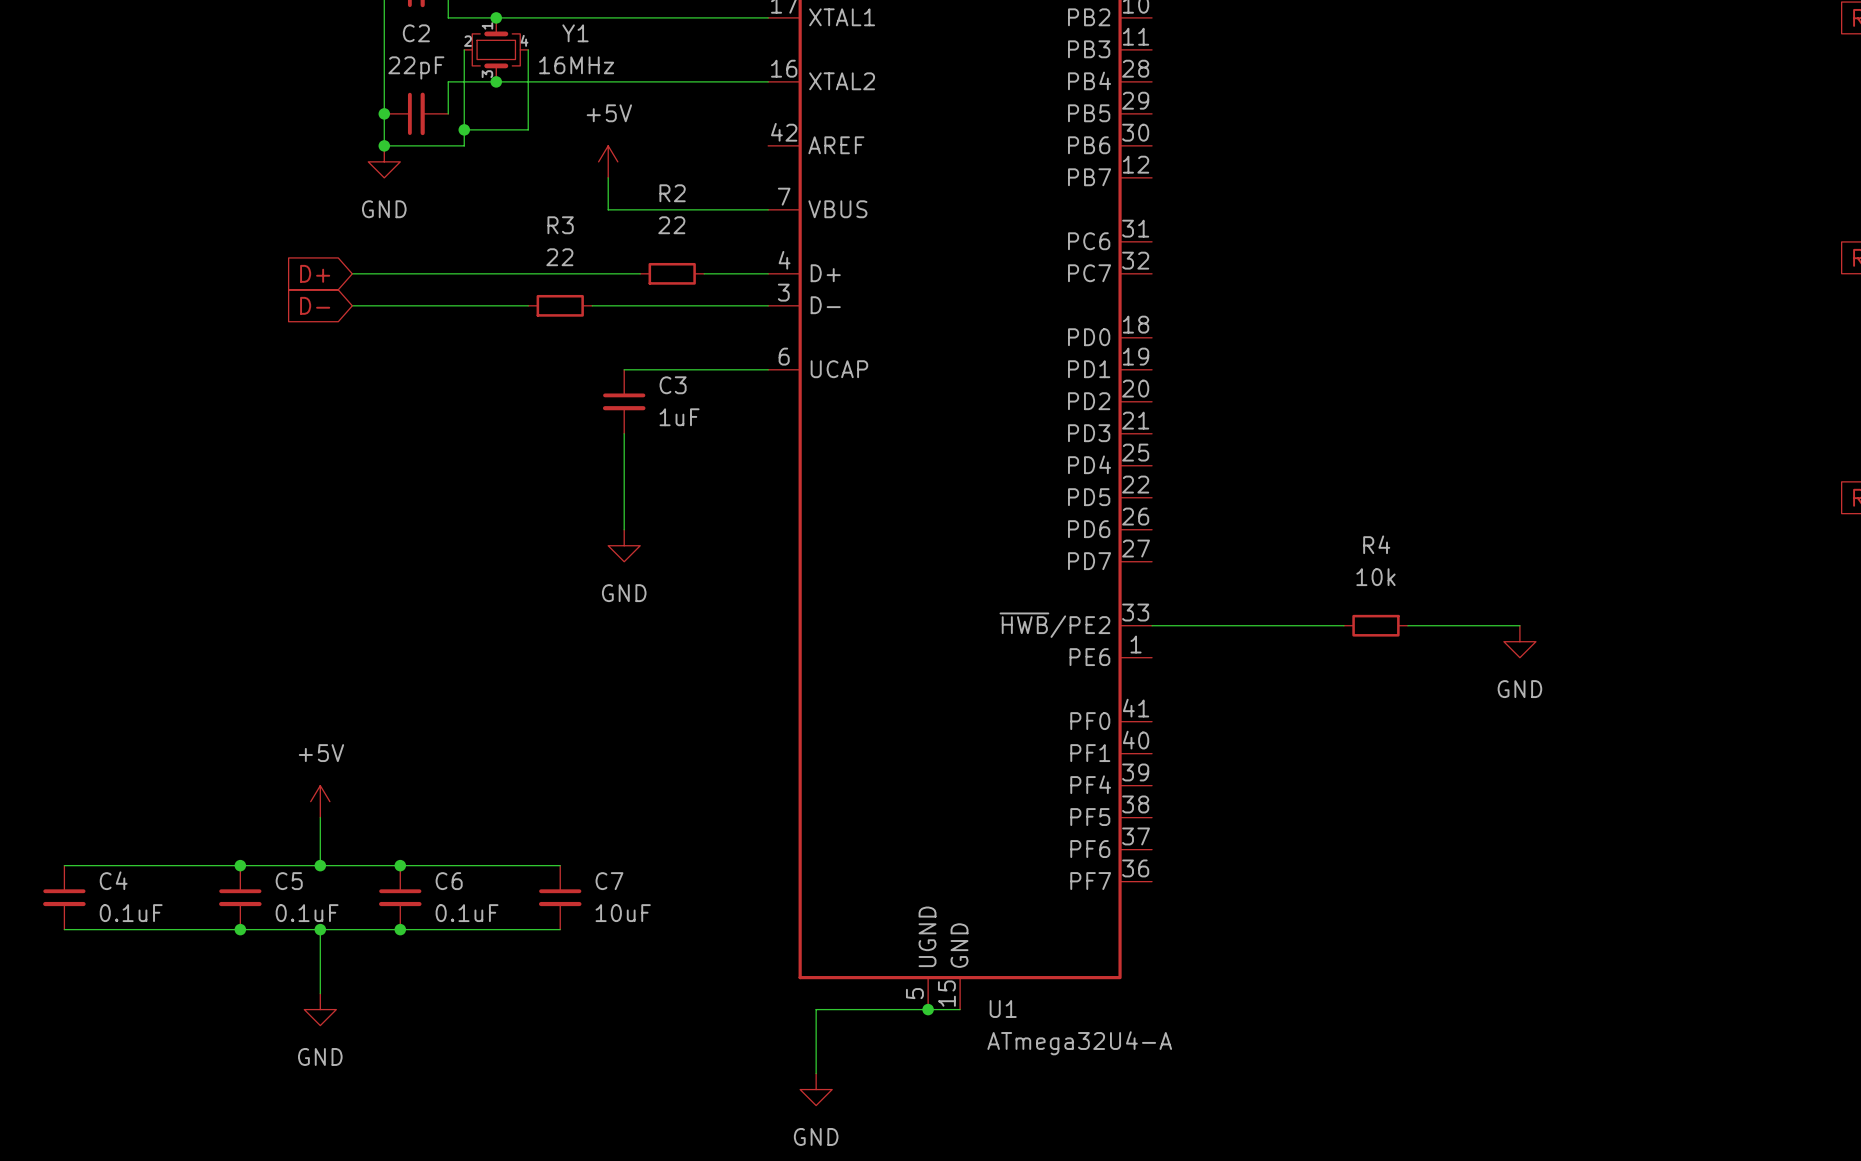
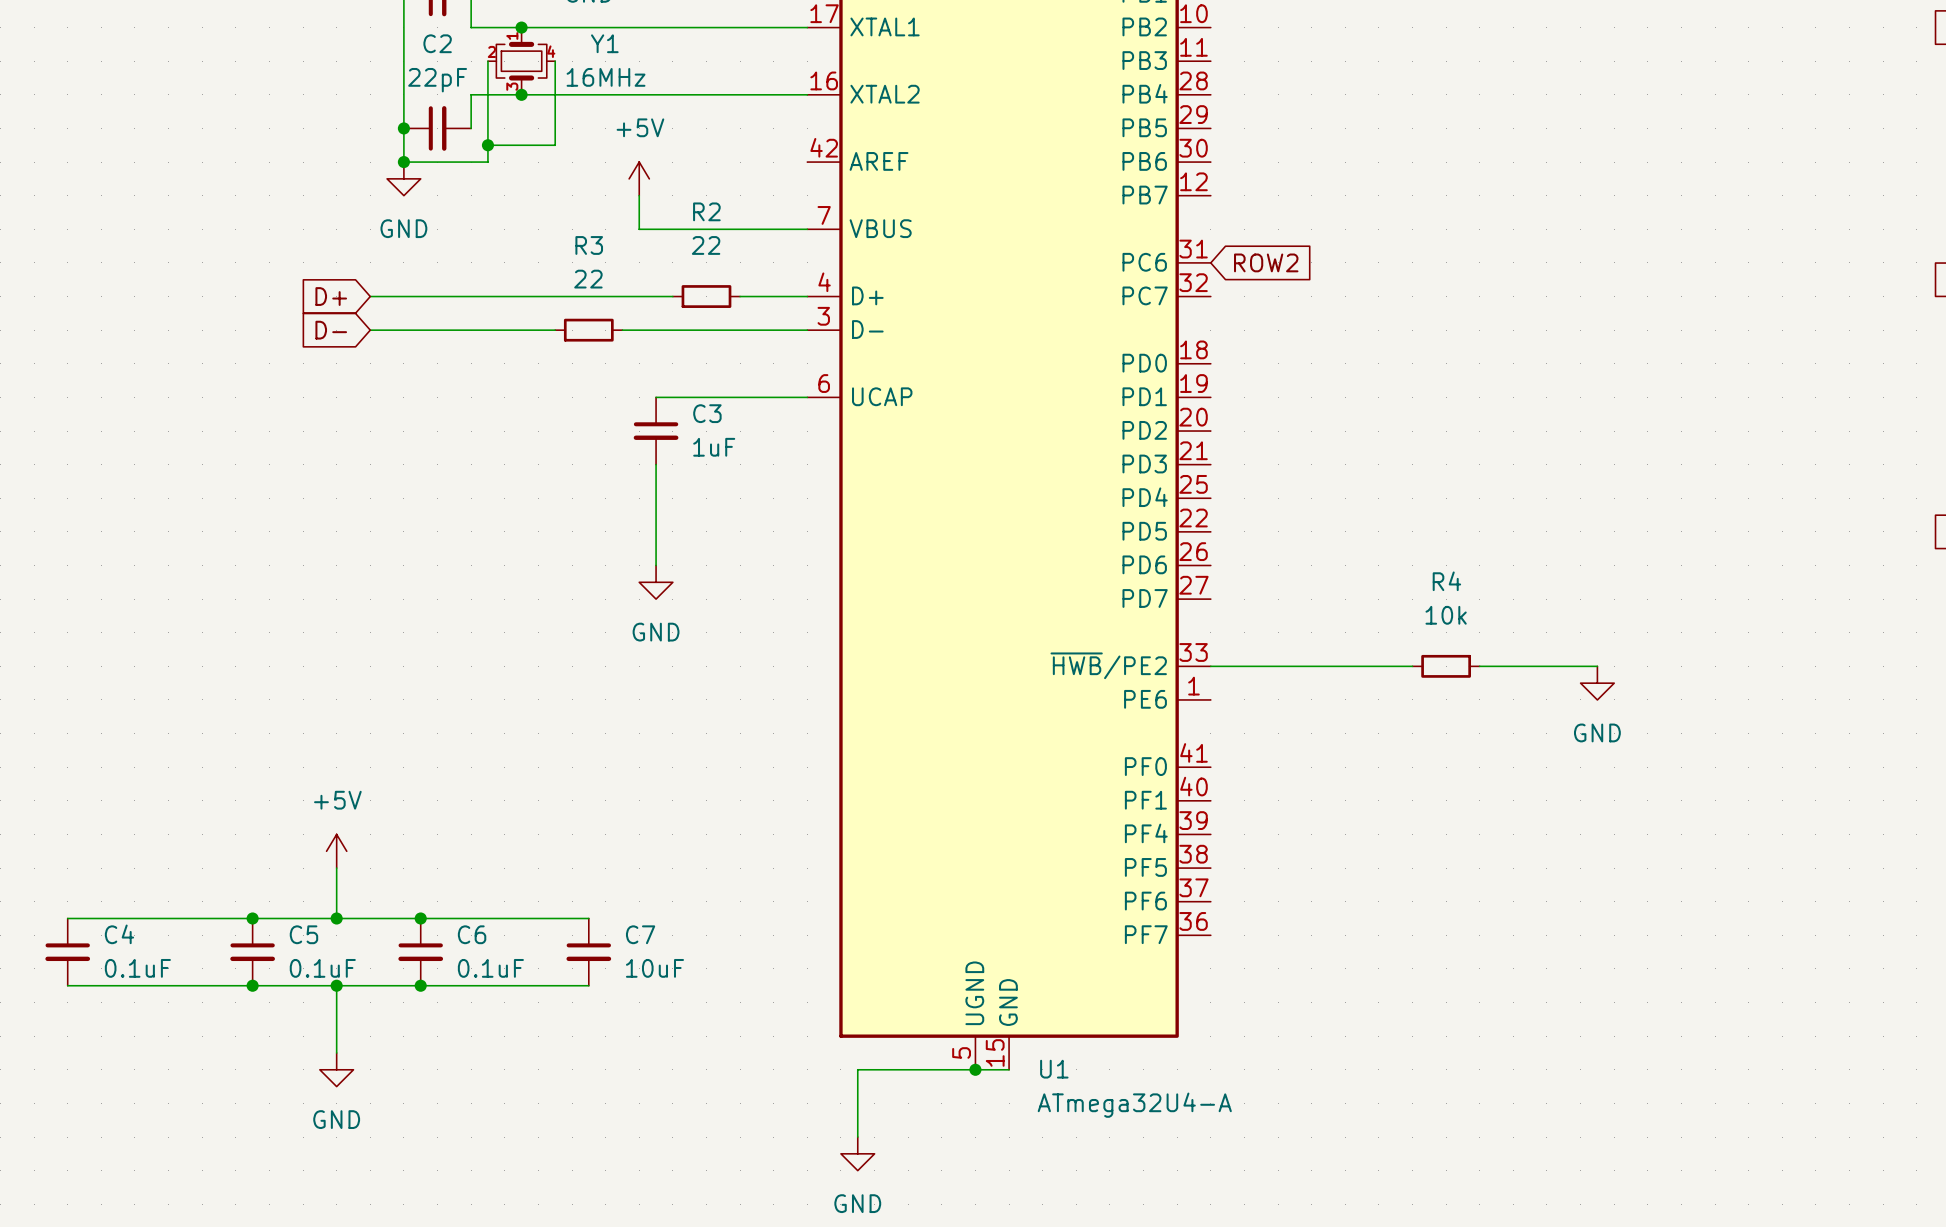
global label: none -> ROW2 (1266, 262)

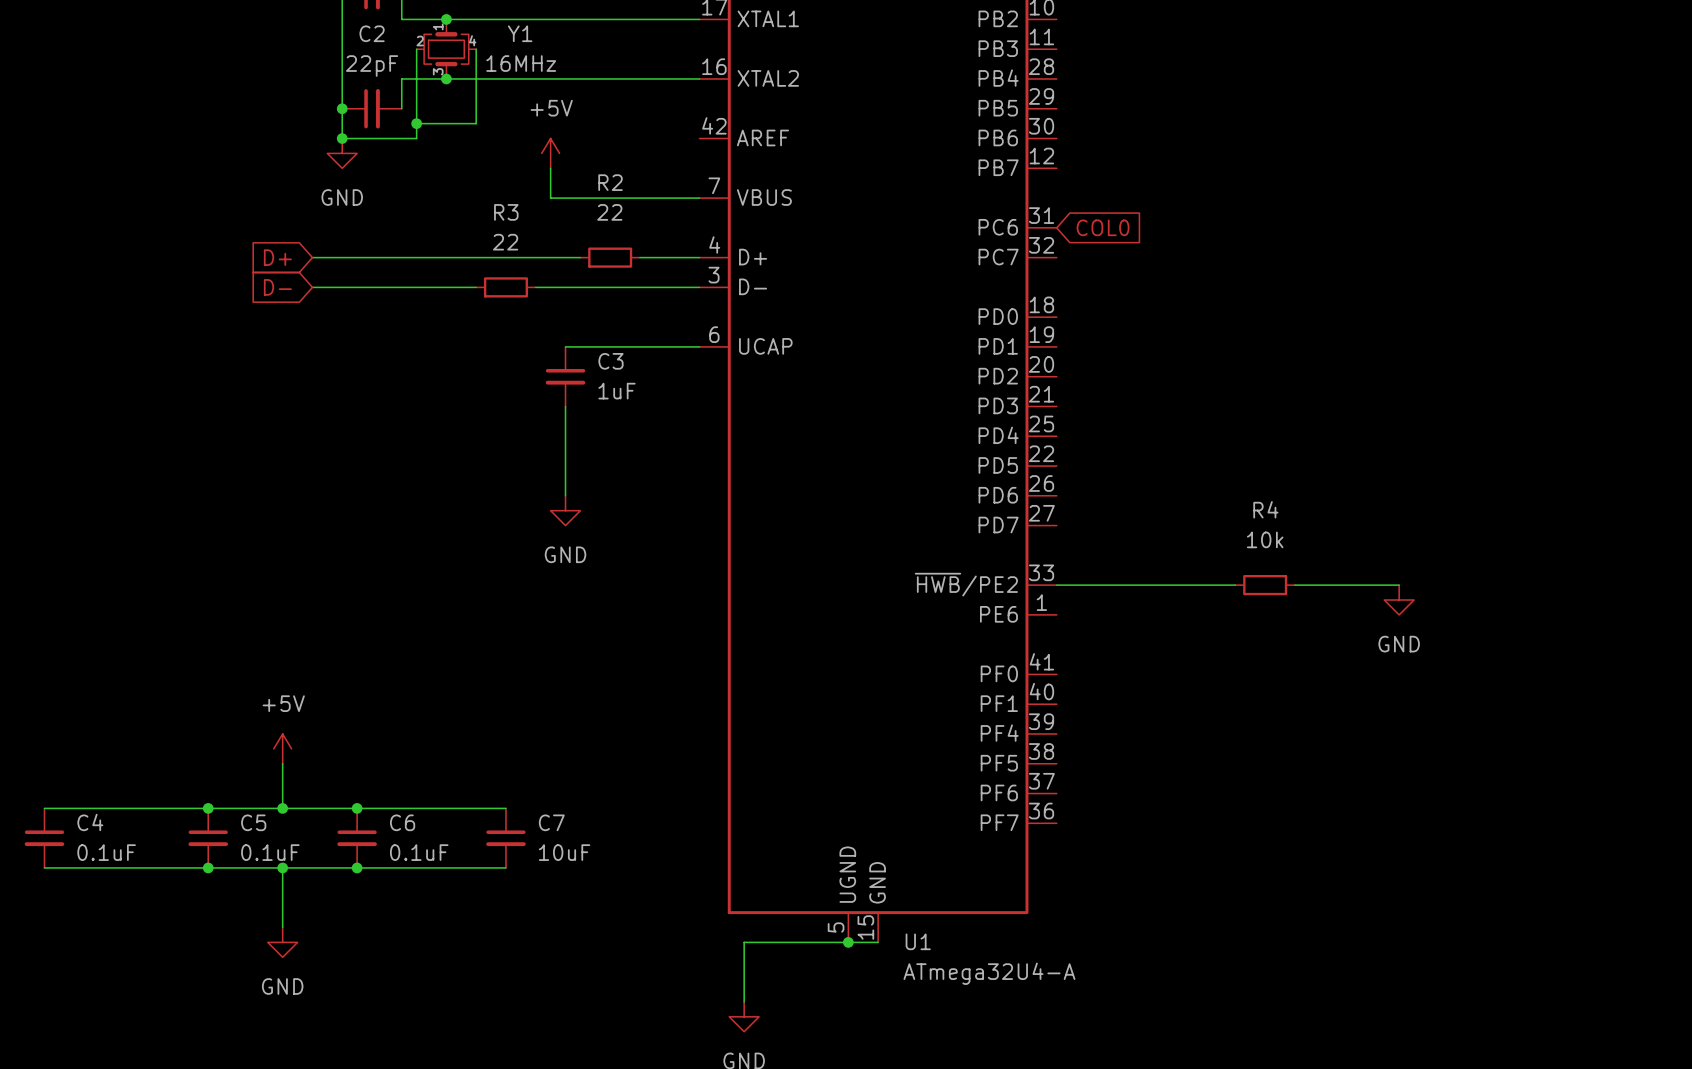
global label: ROW2 (1266, 262) -> COL0 (1103, 227)

